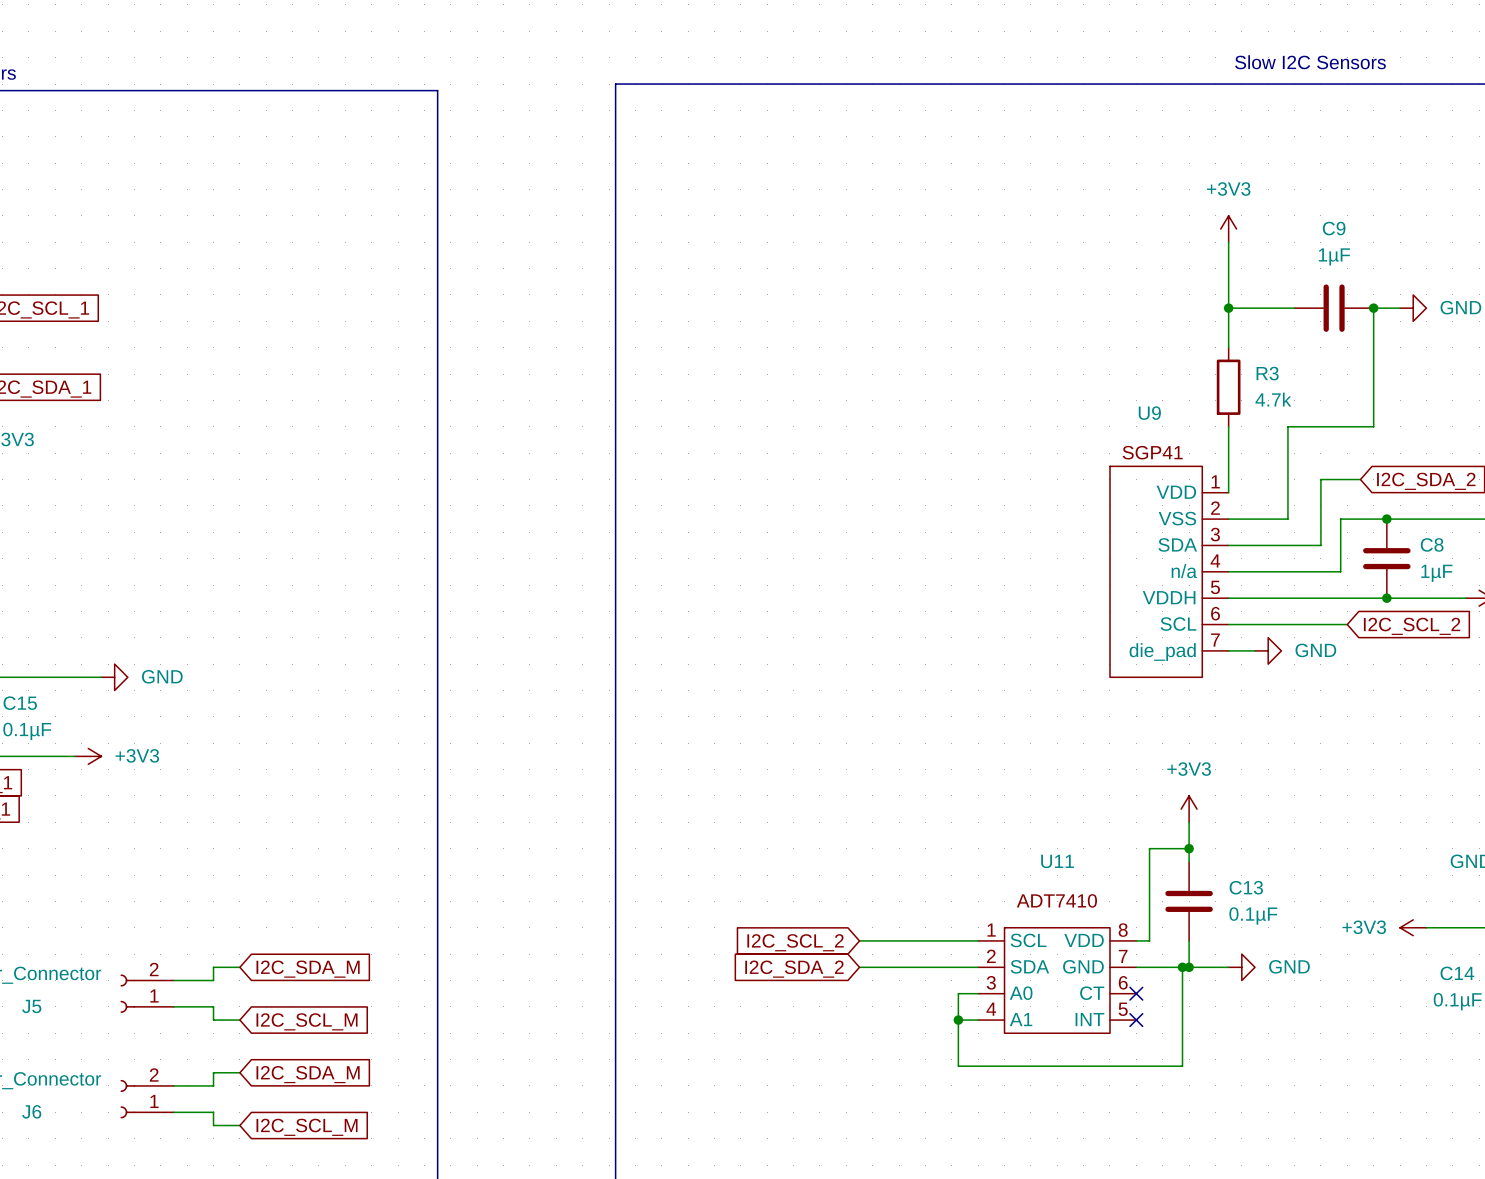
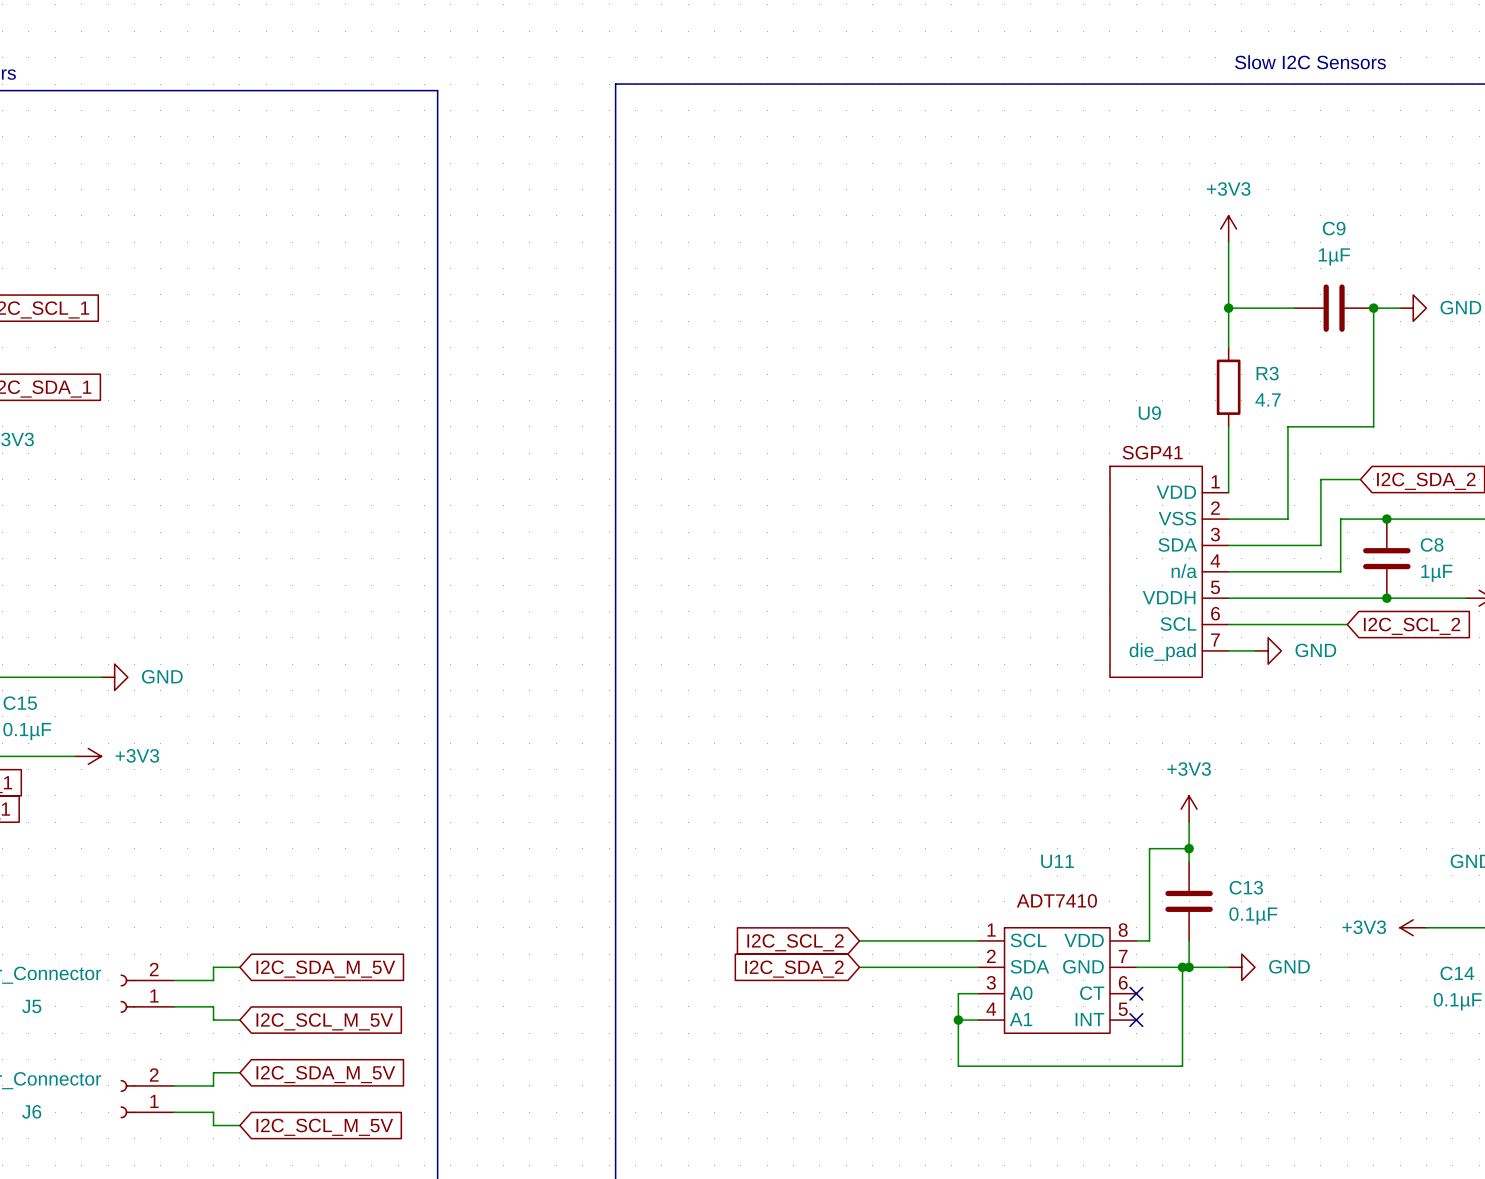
R3 value: 4.7k (1273, 399) -> 4.7 (1268, 399)
global label: I2C_SDA_M (308, 969) -> I2C_SDA_M_5V (325, 969)
global label: I2C_SCL_M (307, 1021) -> I2C_SCL_M_5V (324, 1021)
global label: I2C_SDA_M (308, 1074) -> I2C_SDA_M_5V (325, 1074)
global label: I2C_SCL_M (307, 1127) -> I2C_SCL_M_5V (324, 1127)

